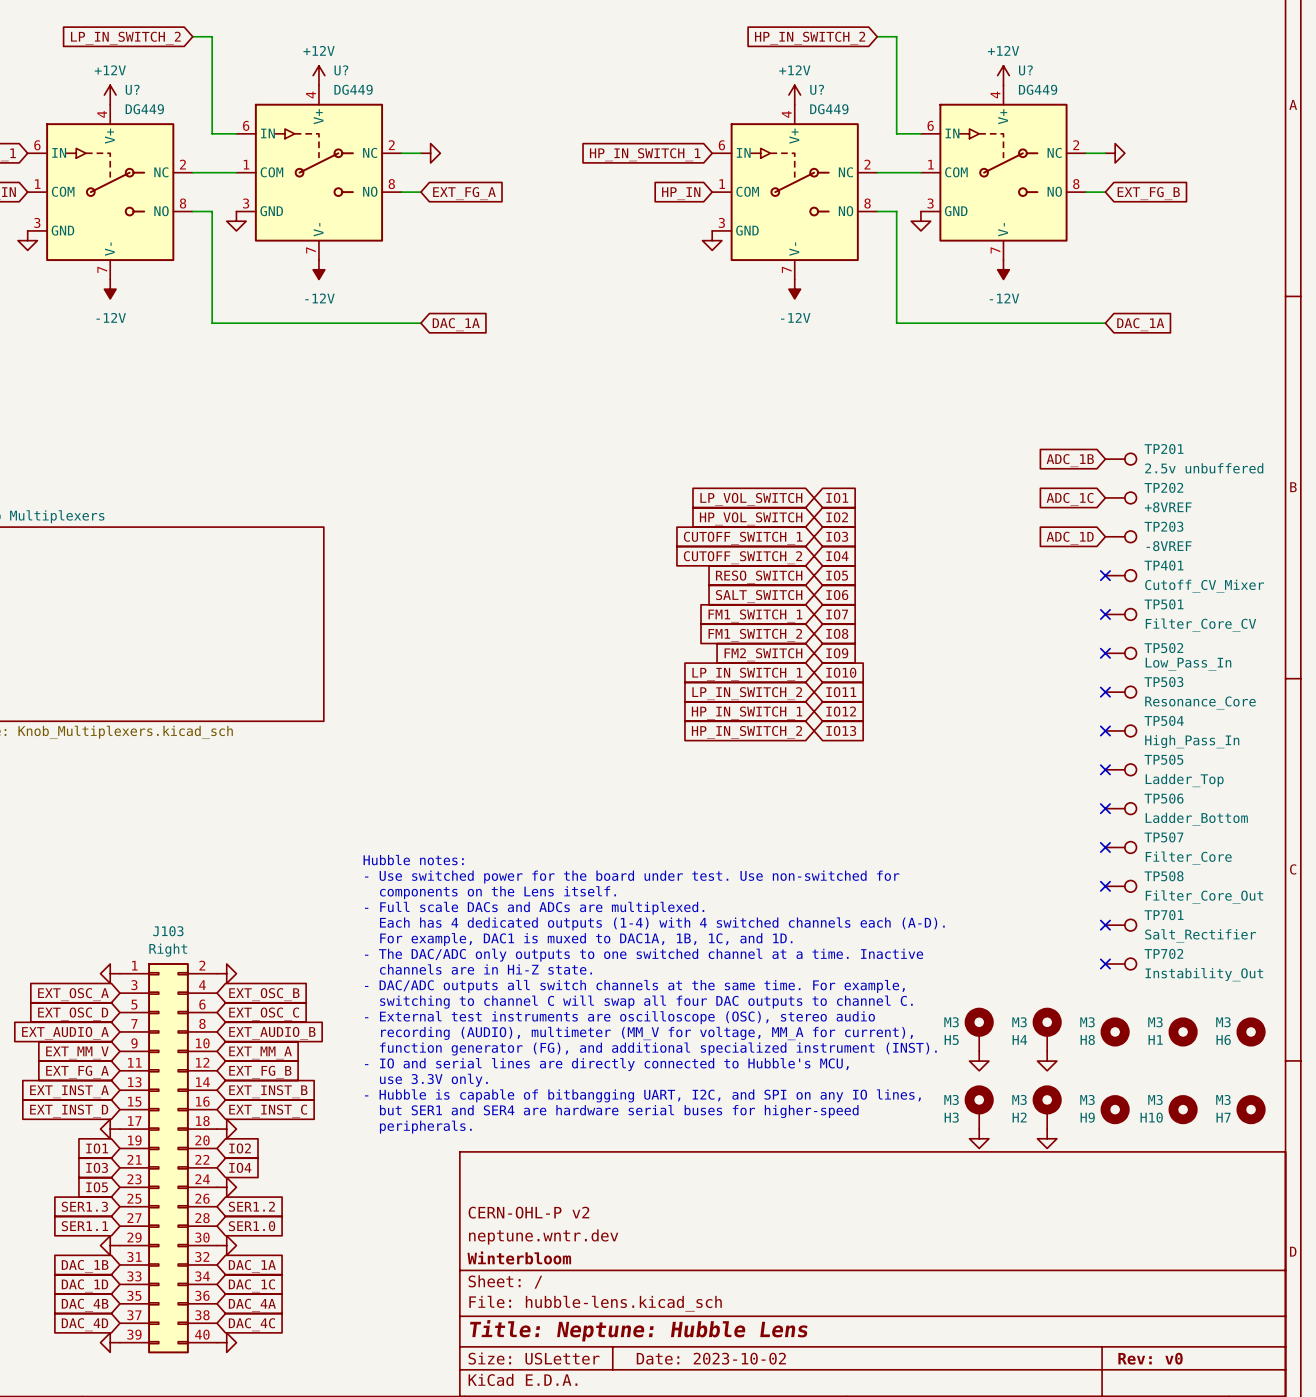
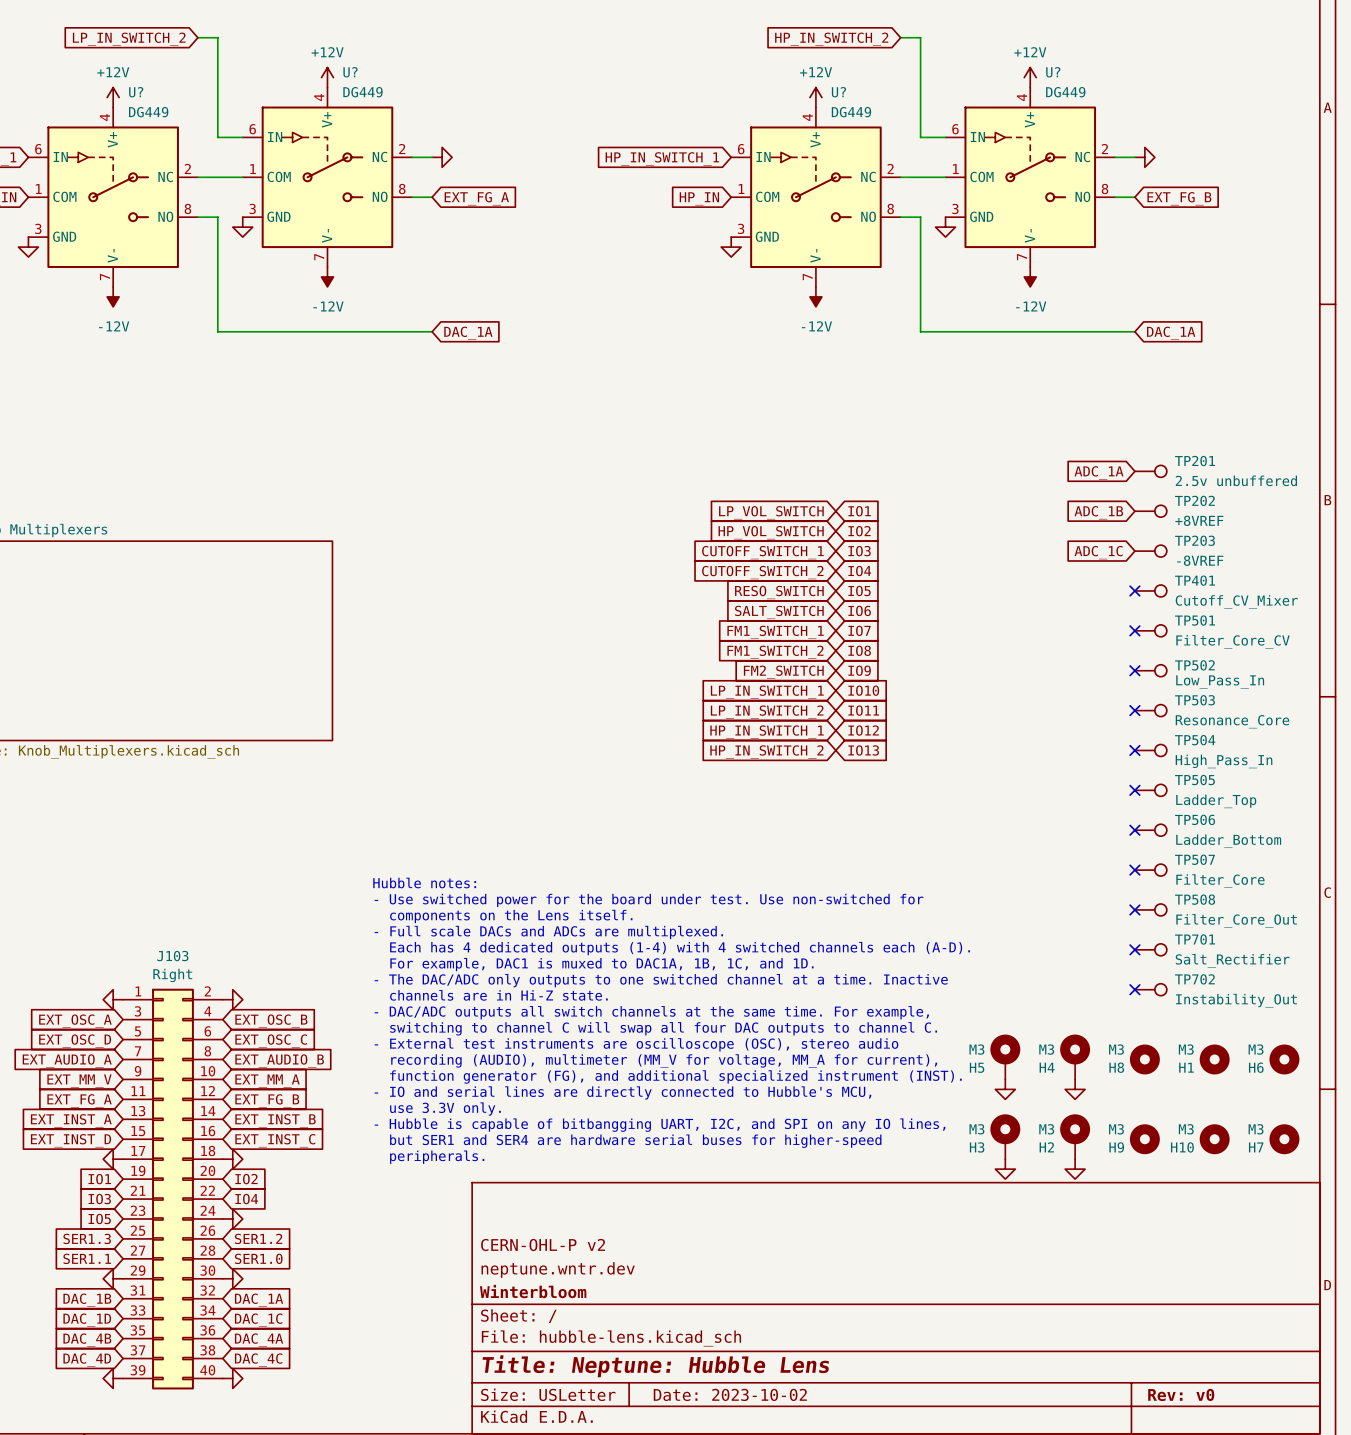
global label: ADC_1B (1070, 460) -> ADC_1A (1099, 472)
global label: ADC_1C (1070, 499) -> ADC_1B (1098, 512)
global label: ADC_1D (1070, 538) -> ADC_1C (1098, 552)

